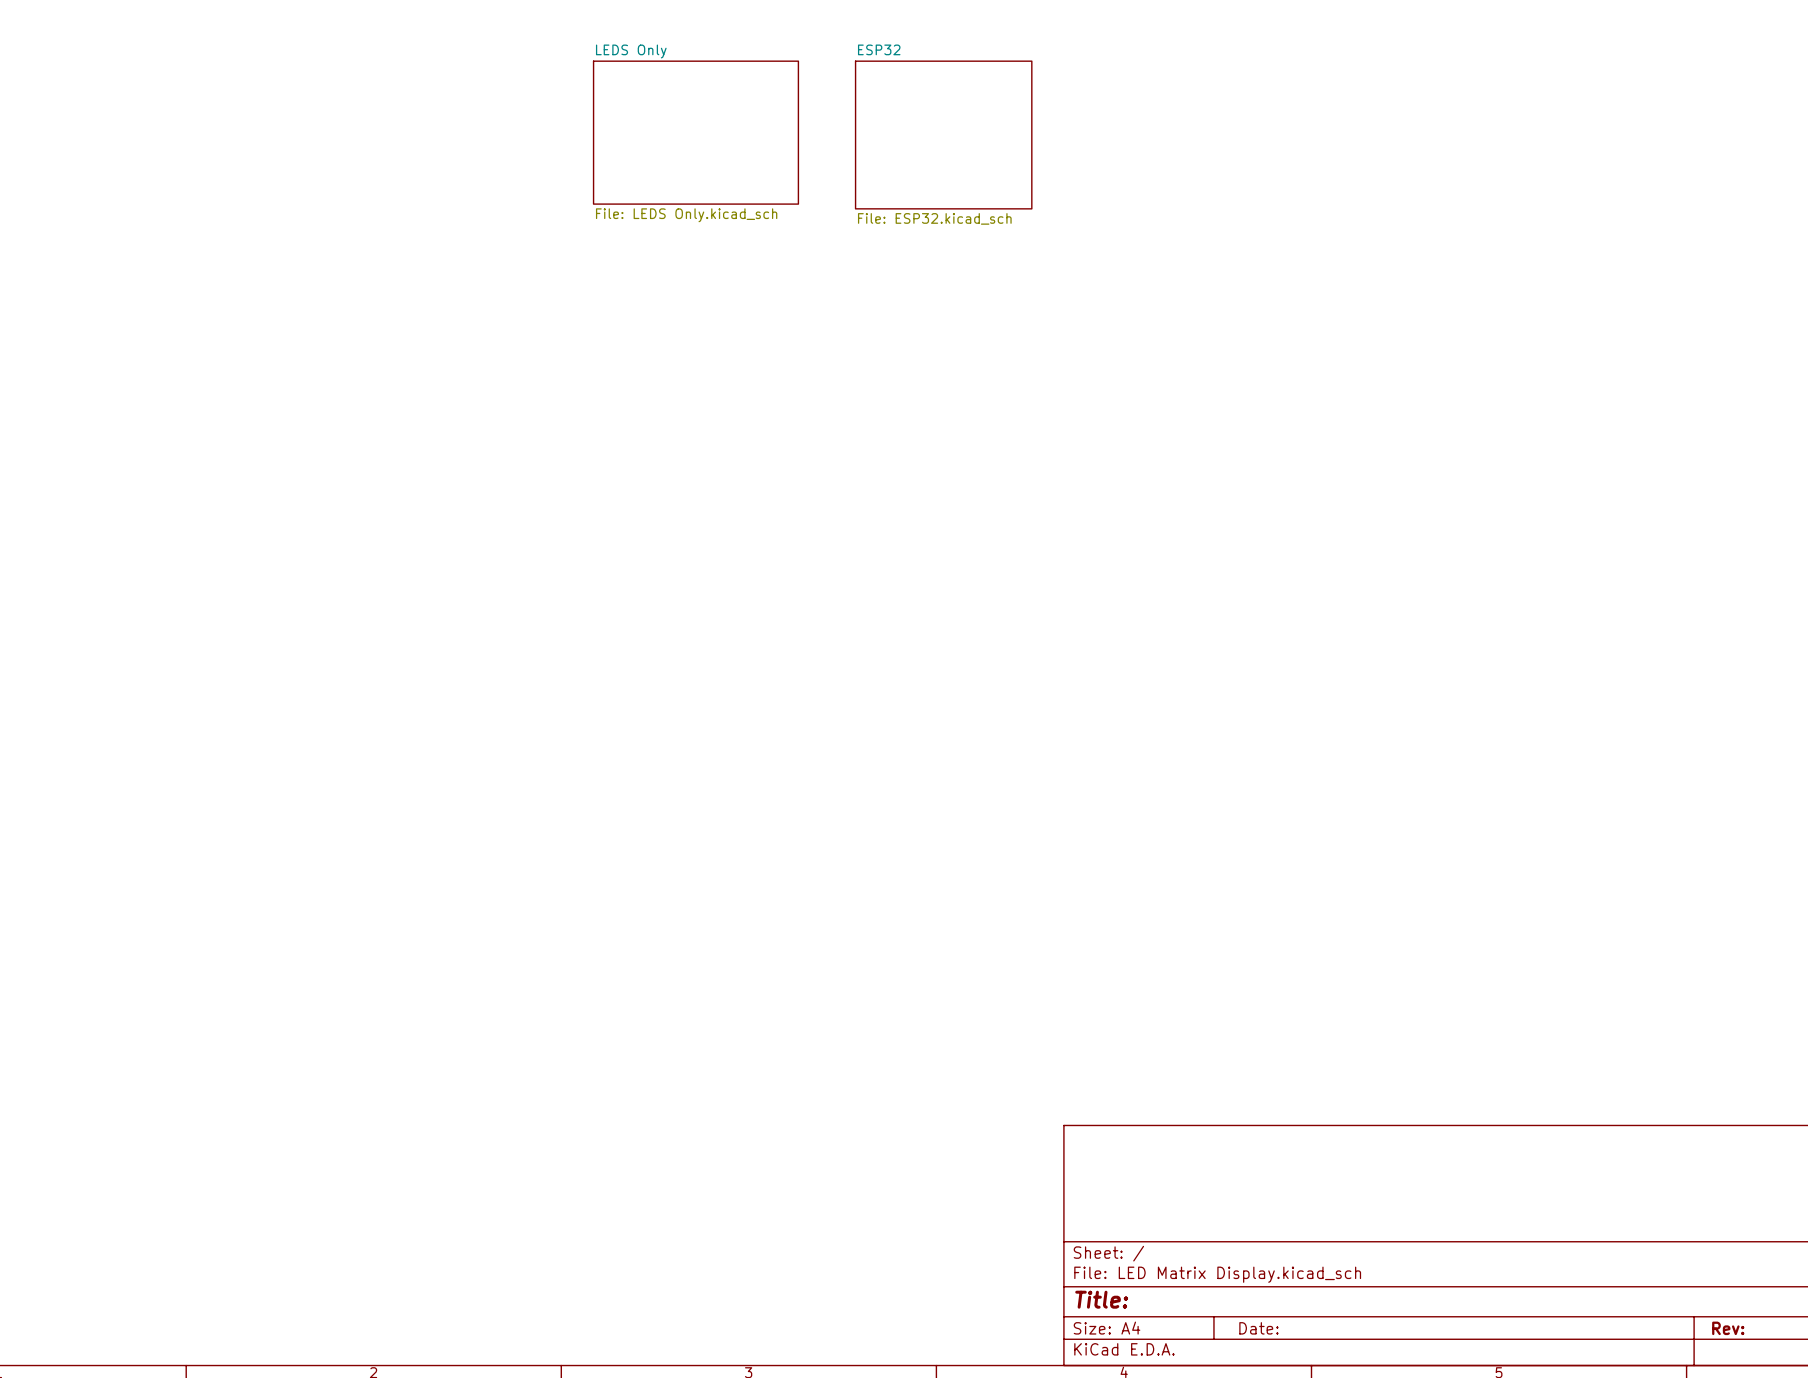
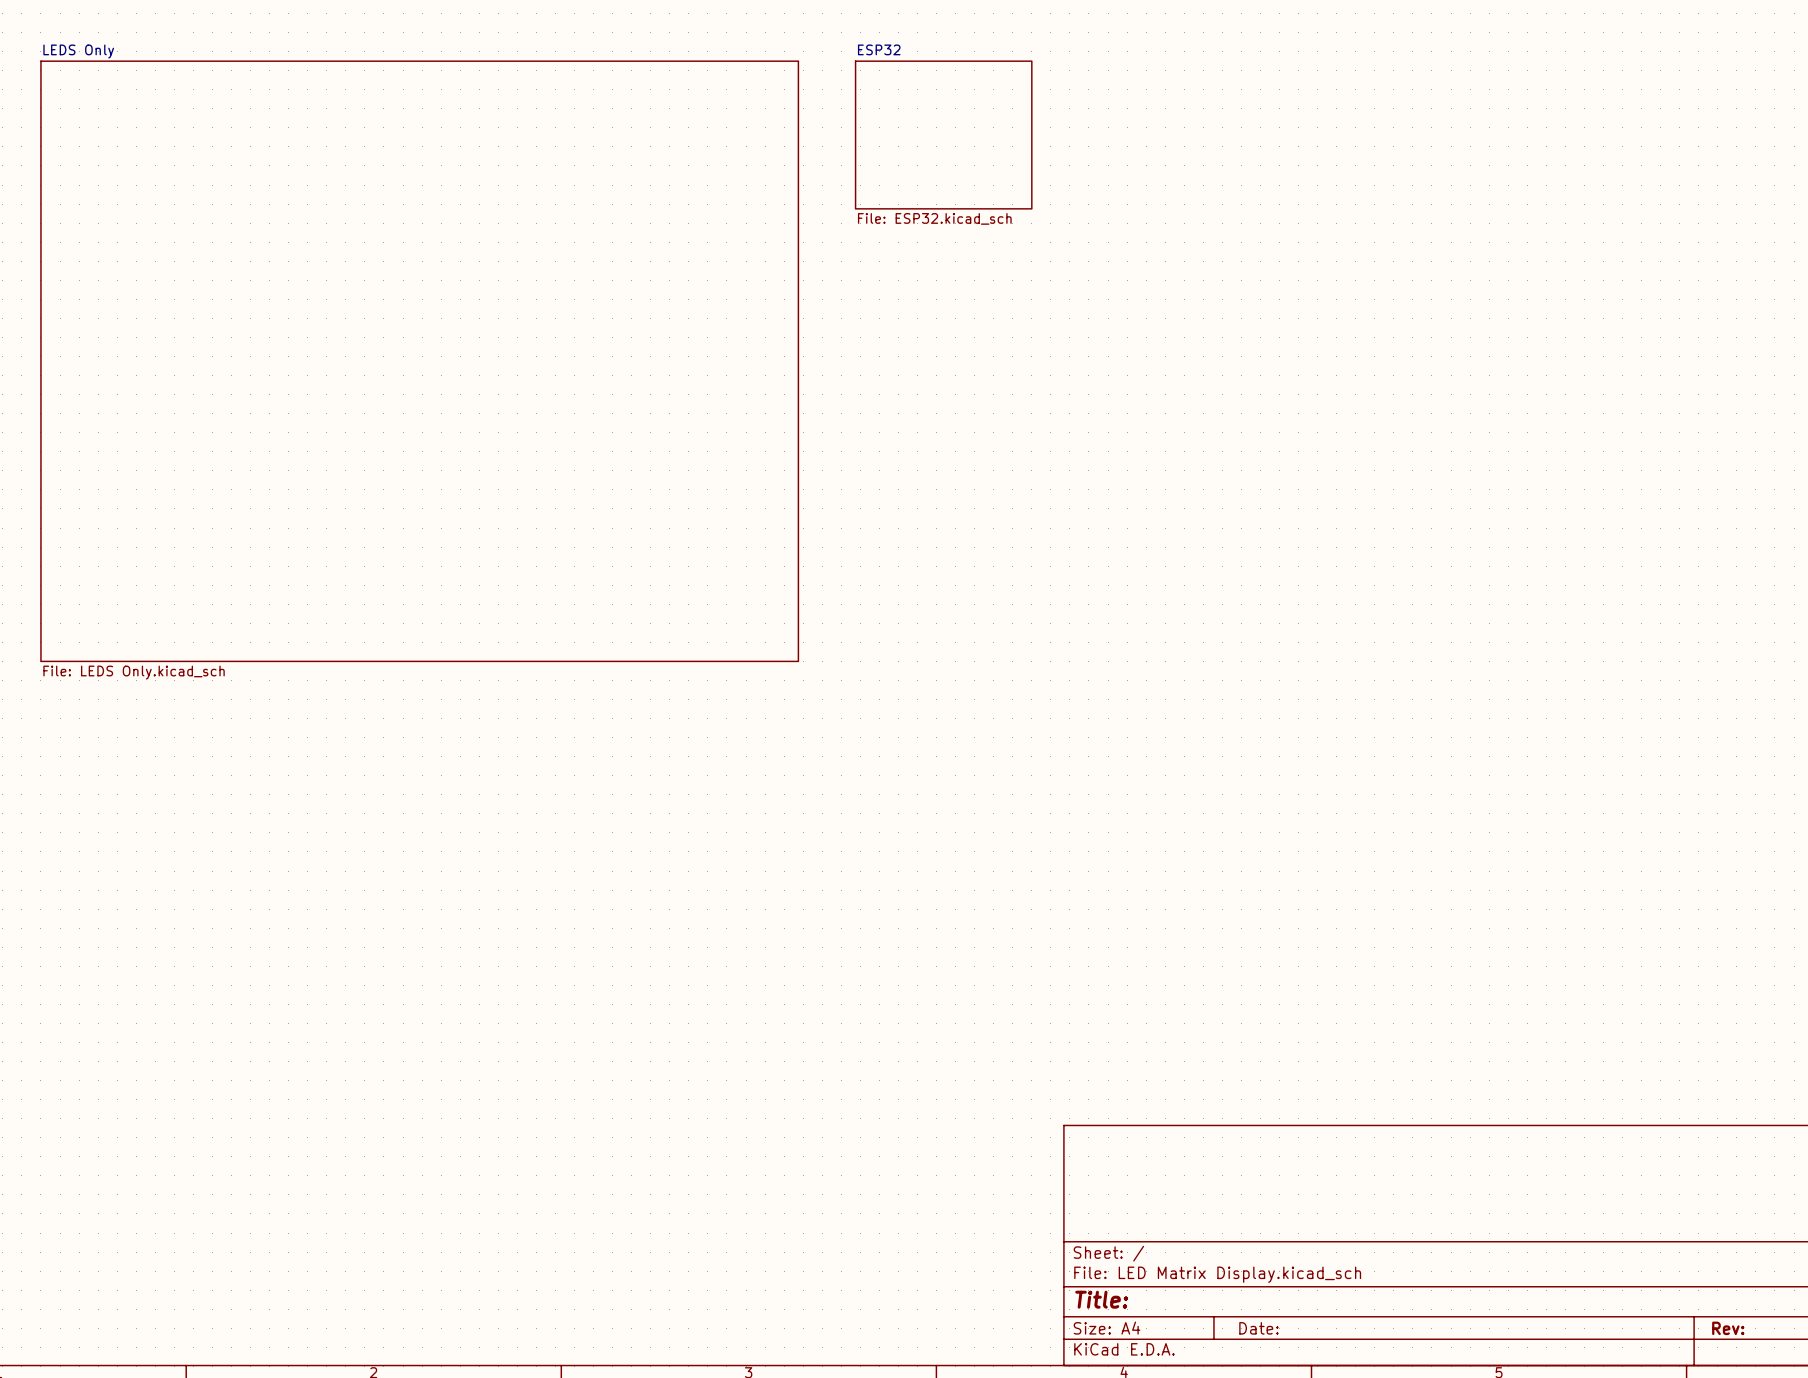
sheet LEDS Only: File: LEDS Only.kicad_sch (695, 132) -> none
sheet LEDS Only: none -> File: LEDS Only.kicad_sch (419, 361)

